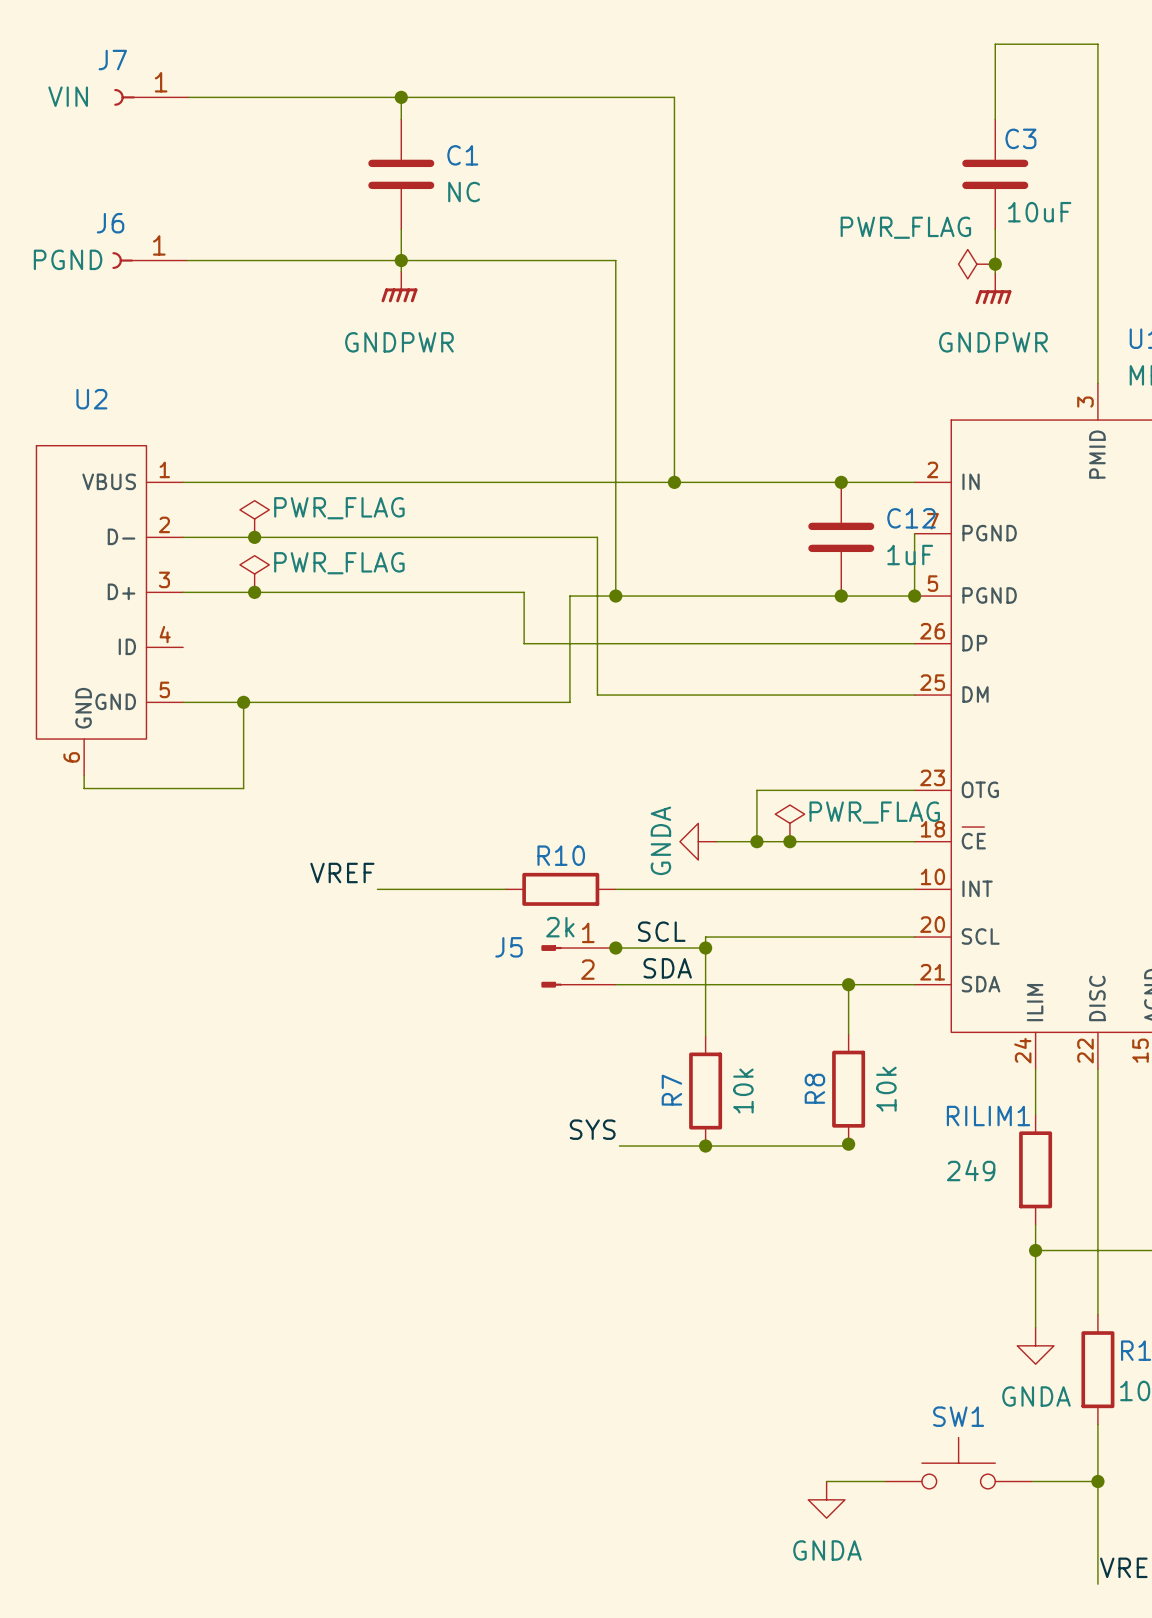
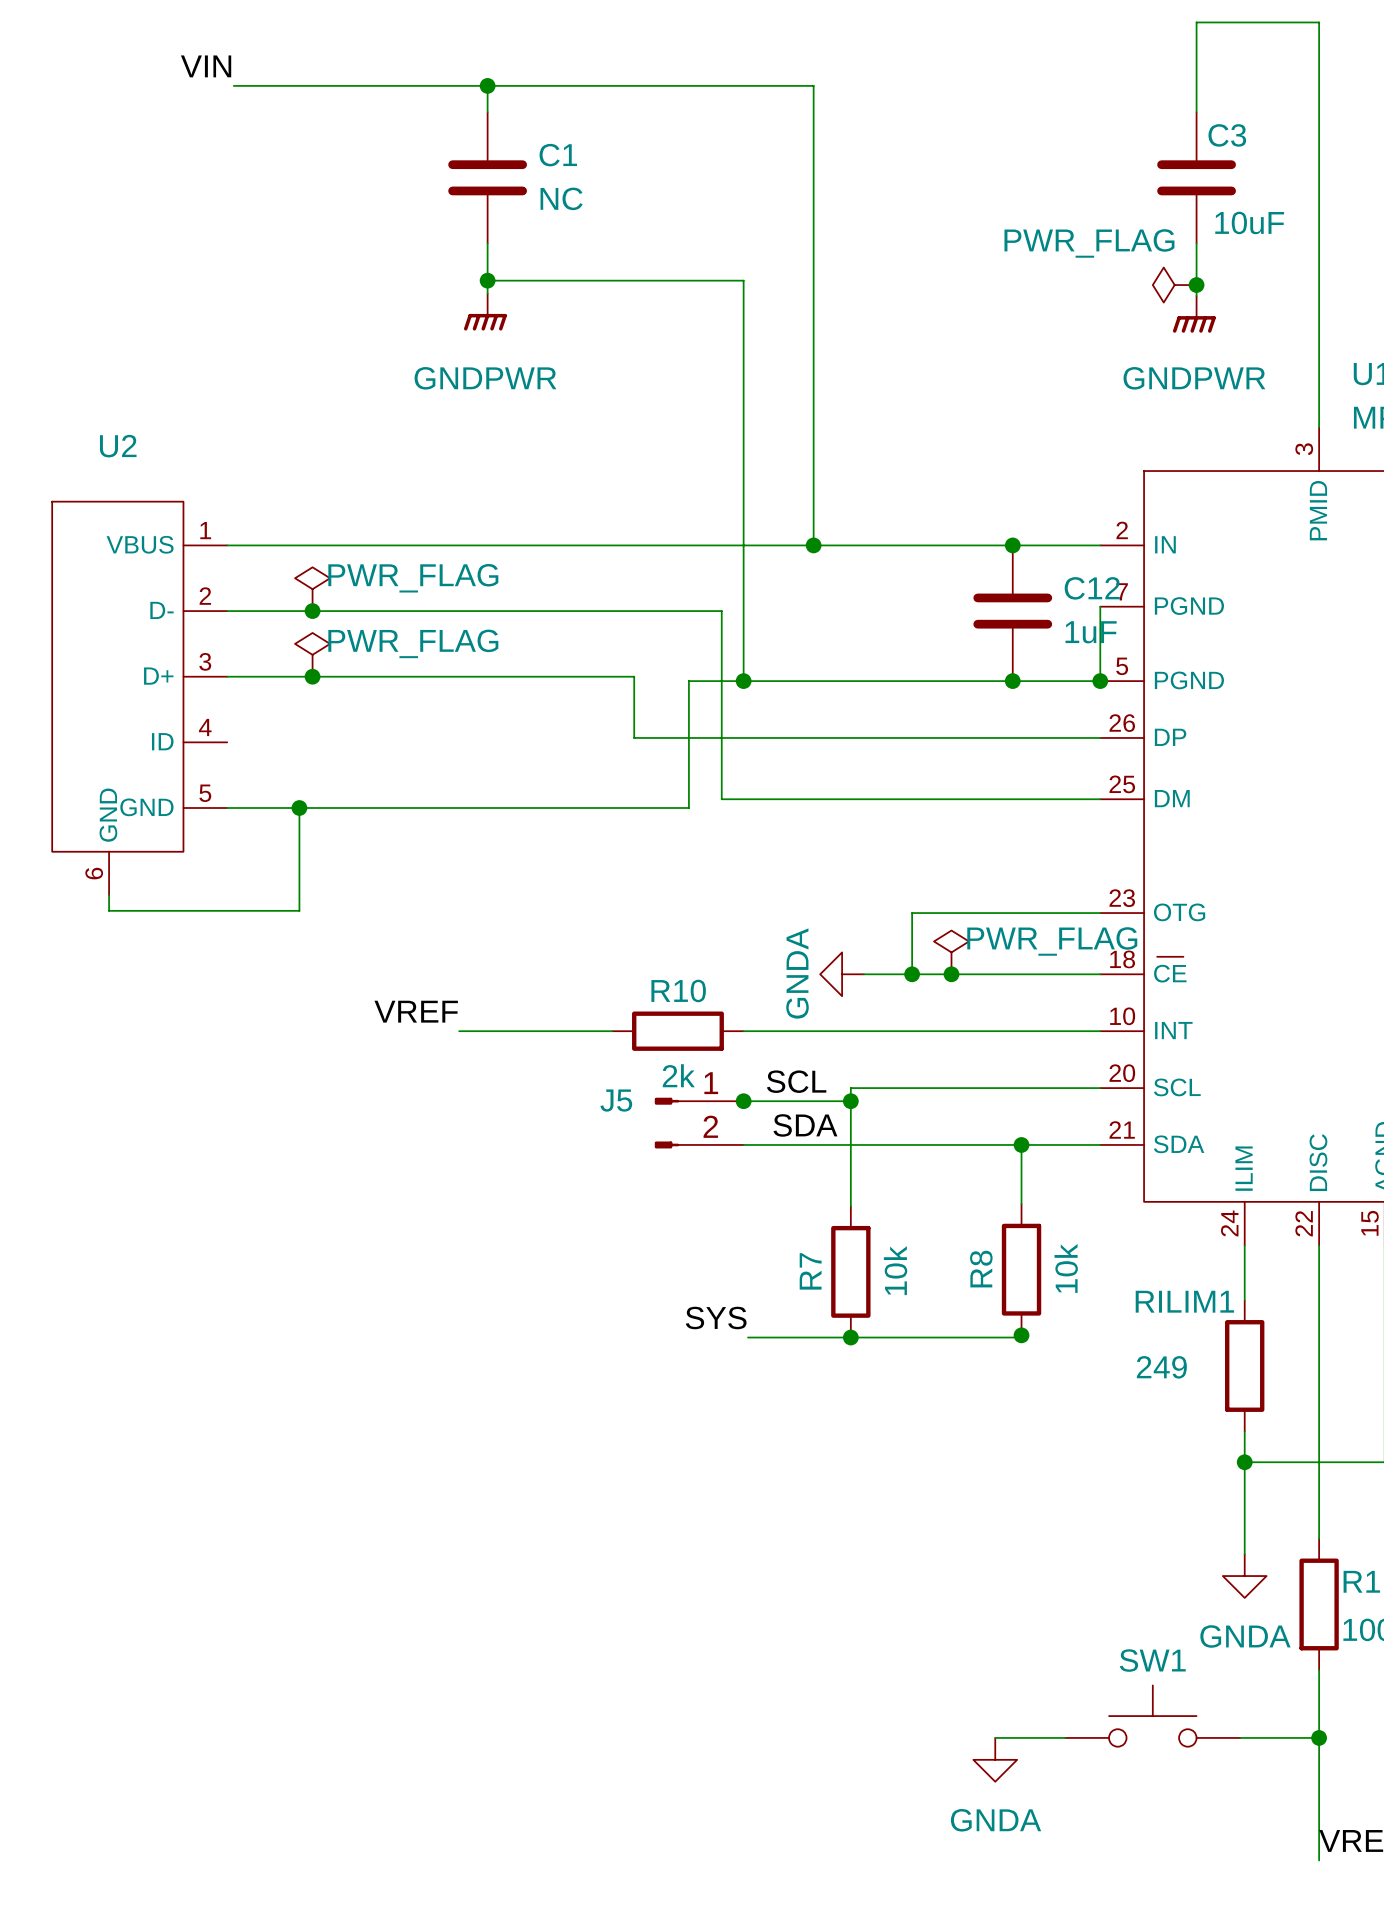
label: none -> VIN (206, 66)
J7: (151, 97) -> none
J6: (149, 260) -> none
wire: (186, 260) (401, 260) -> none

